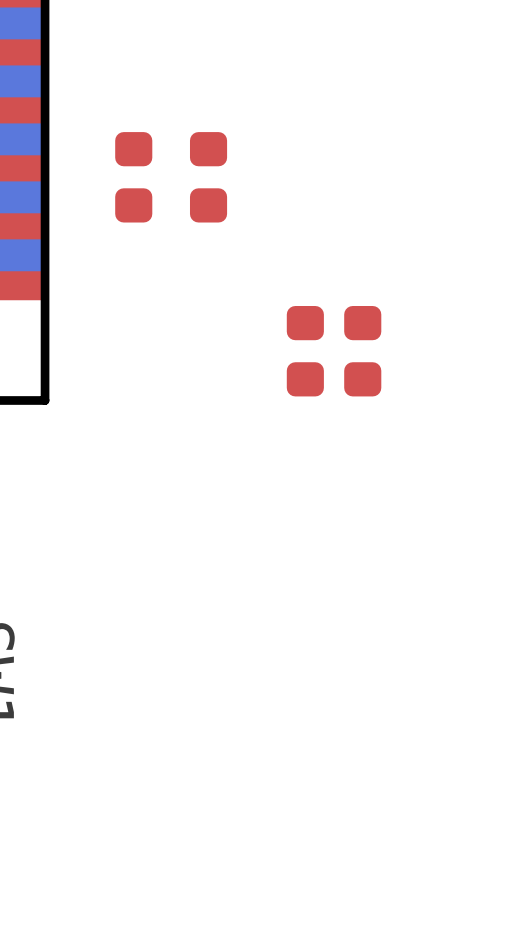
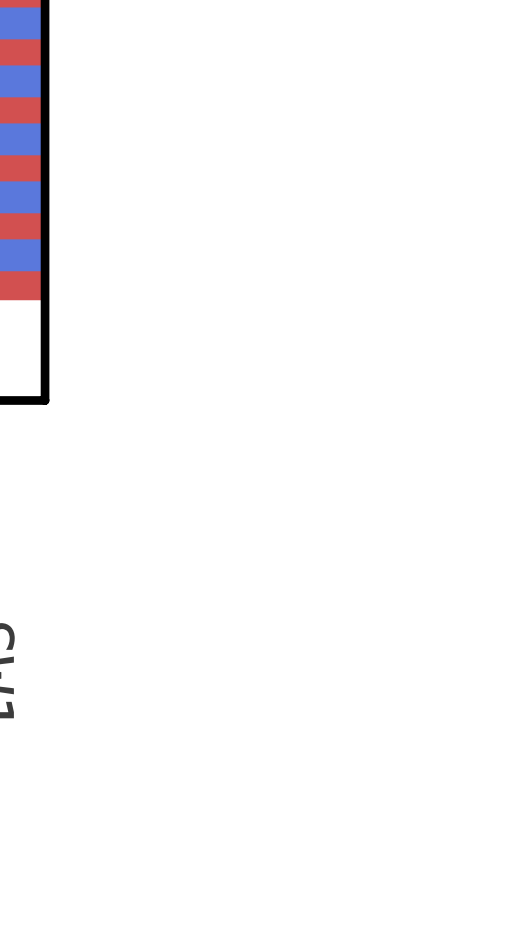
part: (133, 177) -> none
part: (208, 177) -> none
part: (305, 351) -> none
part: (362, 351) -> none

